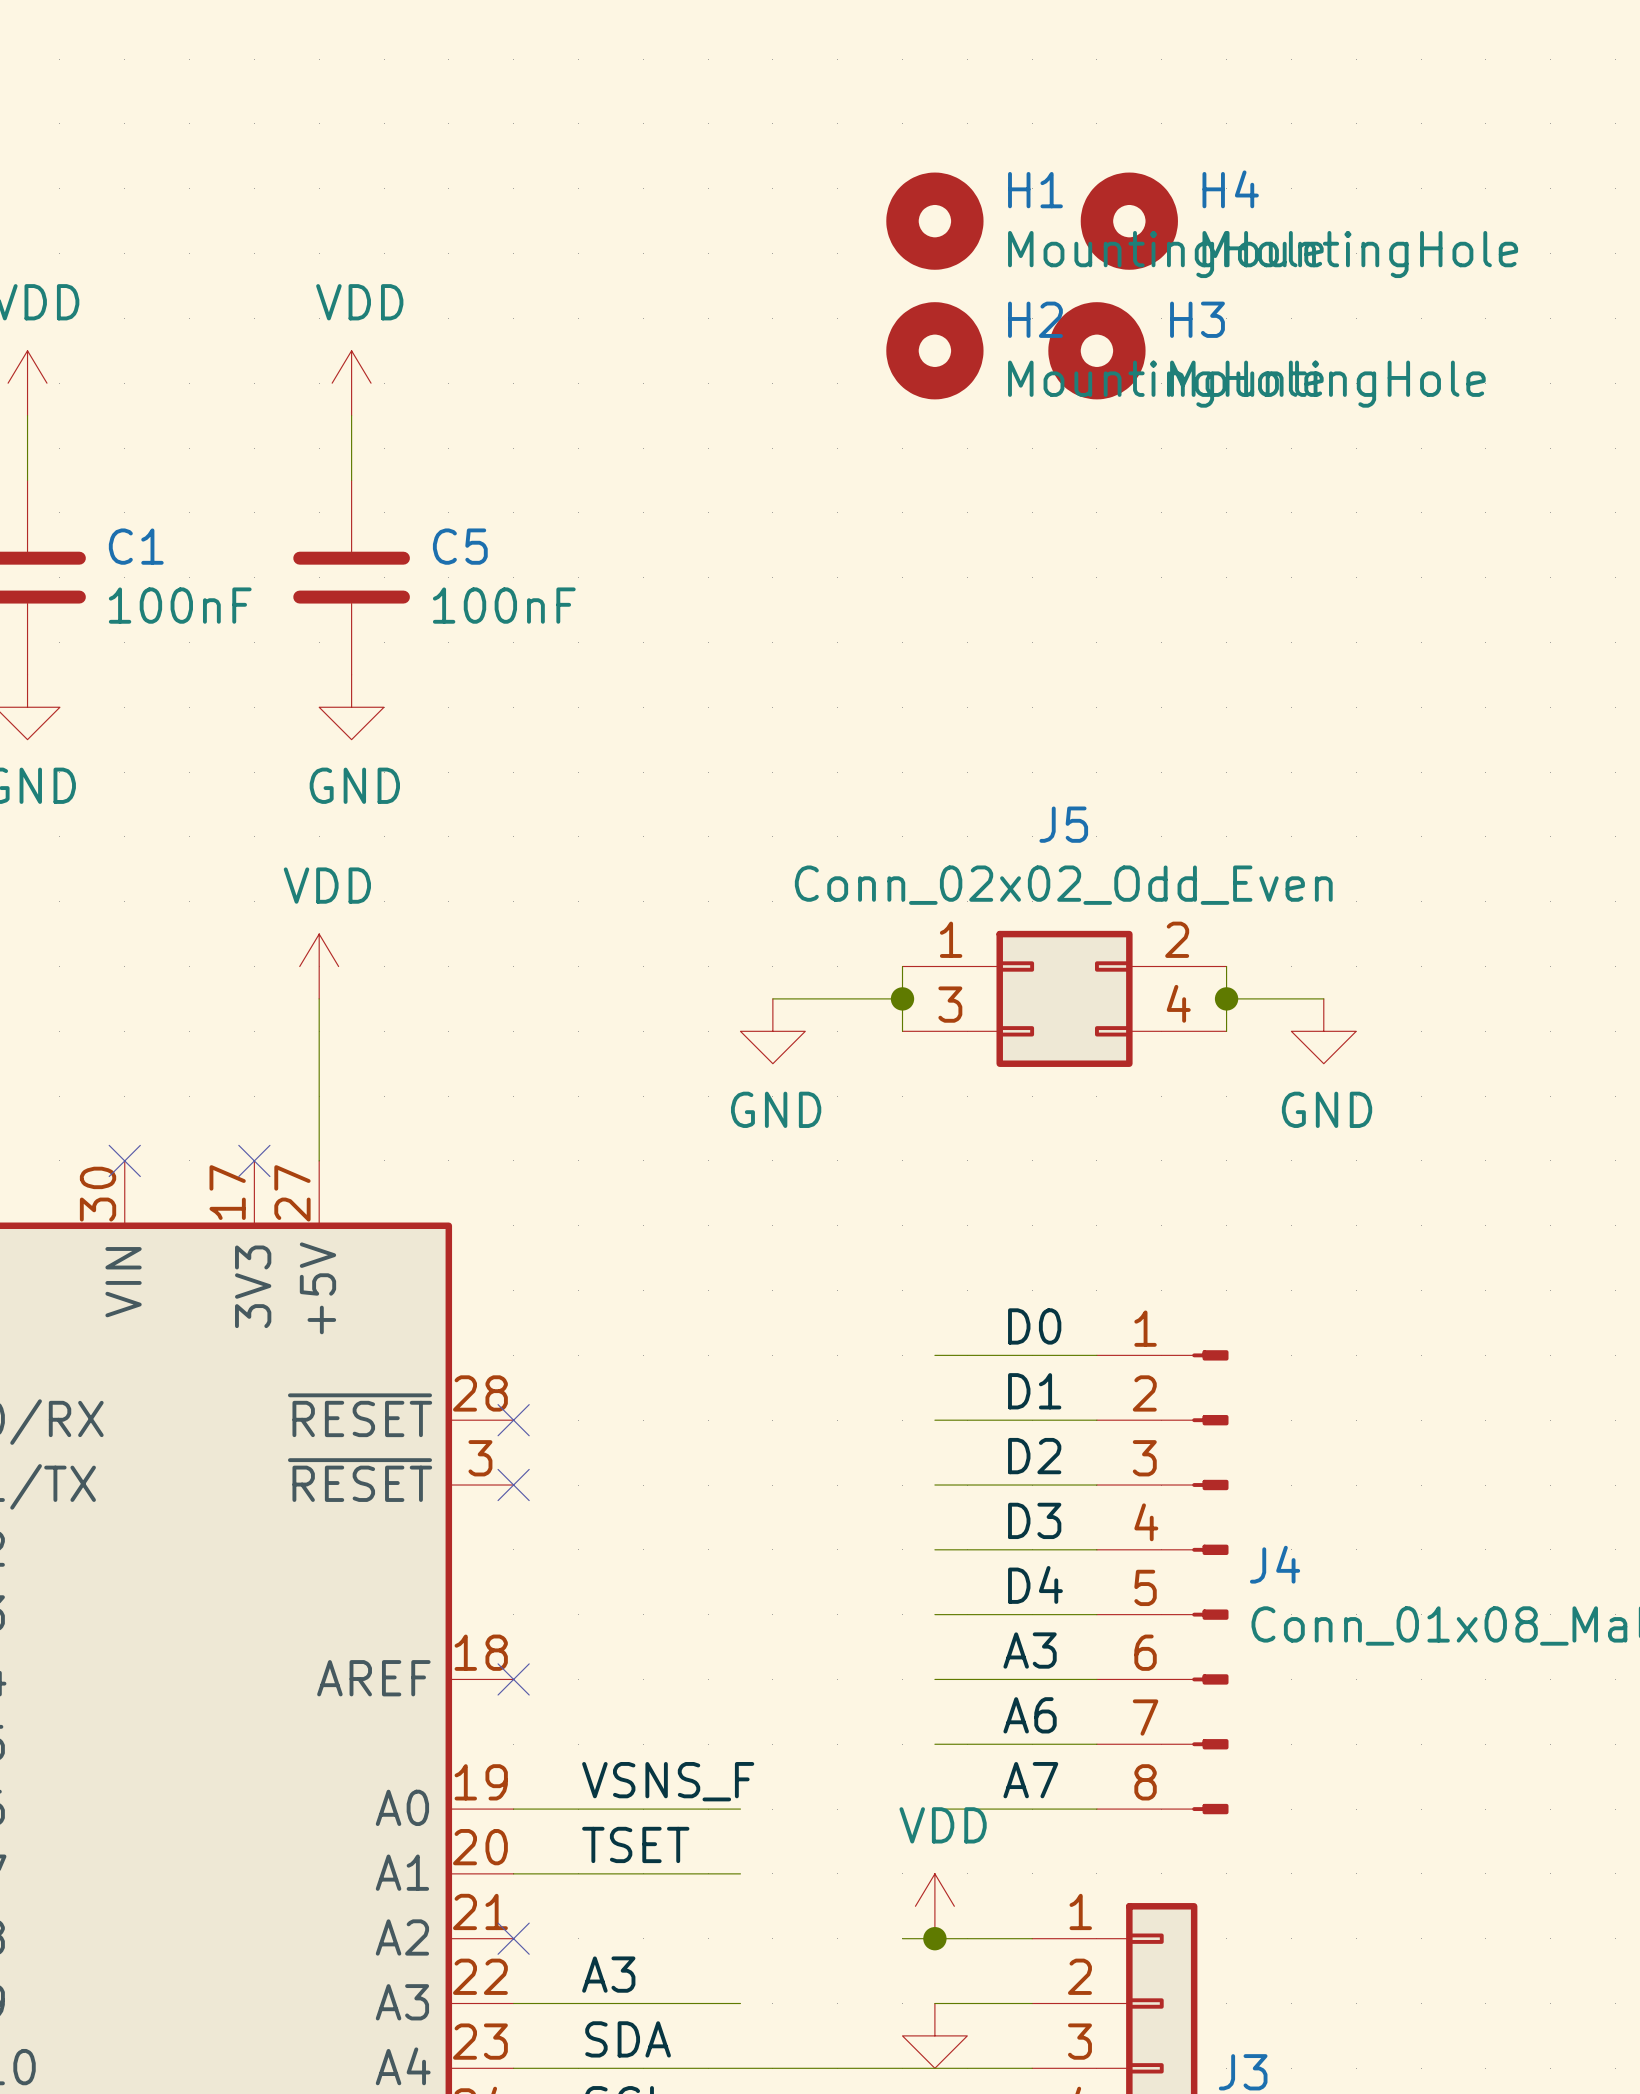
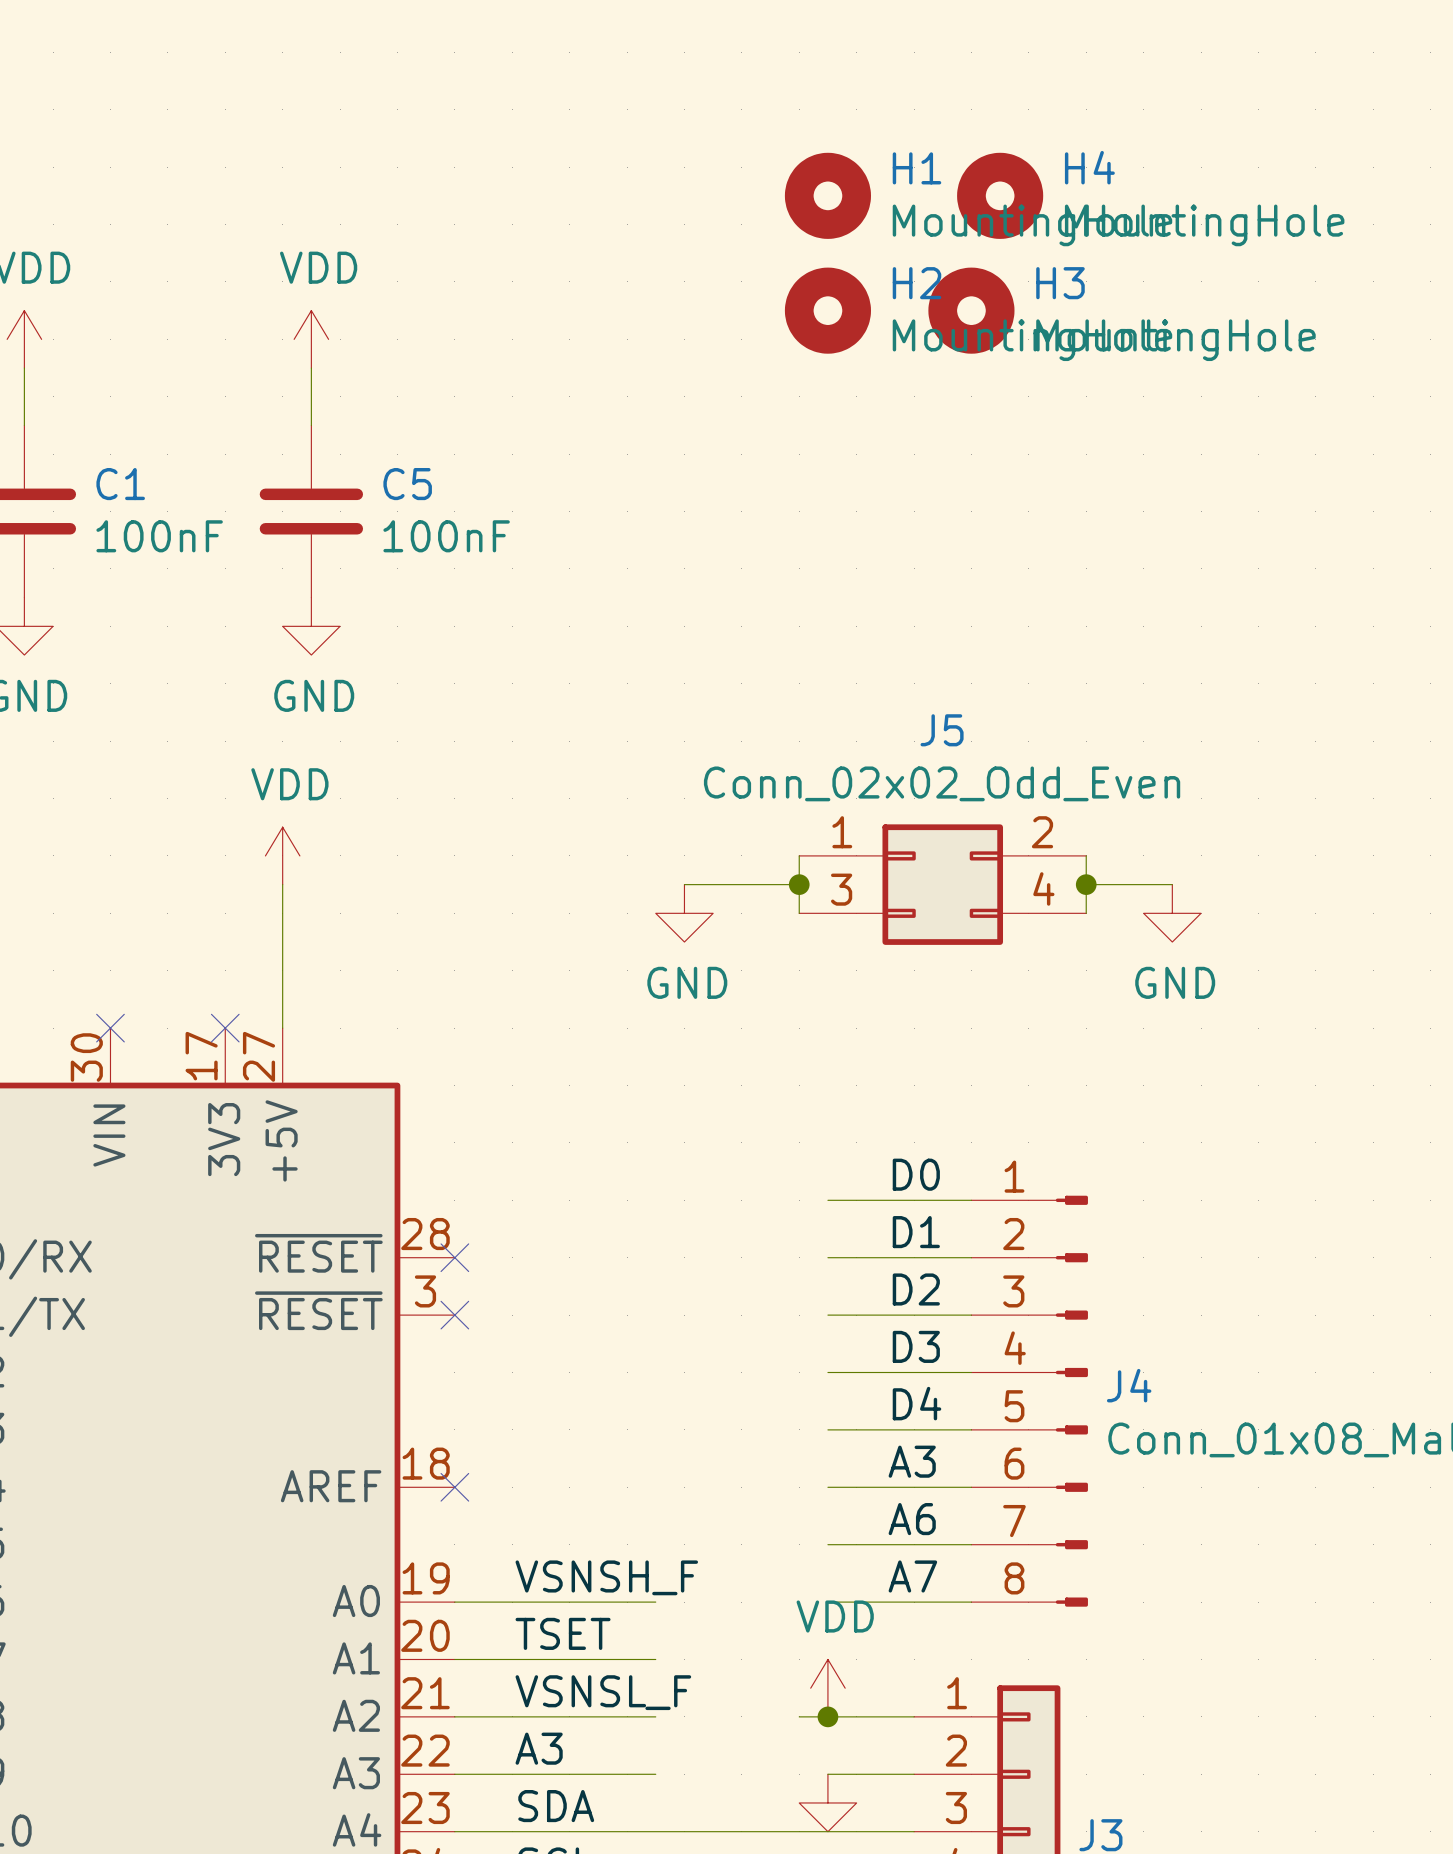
label: VSNS_F (668, 1781) -> VSNSH_F (606, 1577)
label: none -> VSNSL_F (603, 1692)
wire: none -> (454, 1716) (655, 1716)
no-connect mark: (513, 1938) -> none

